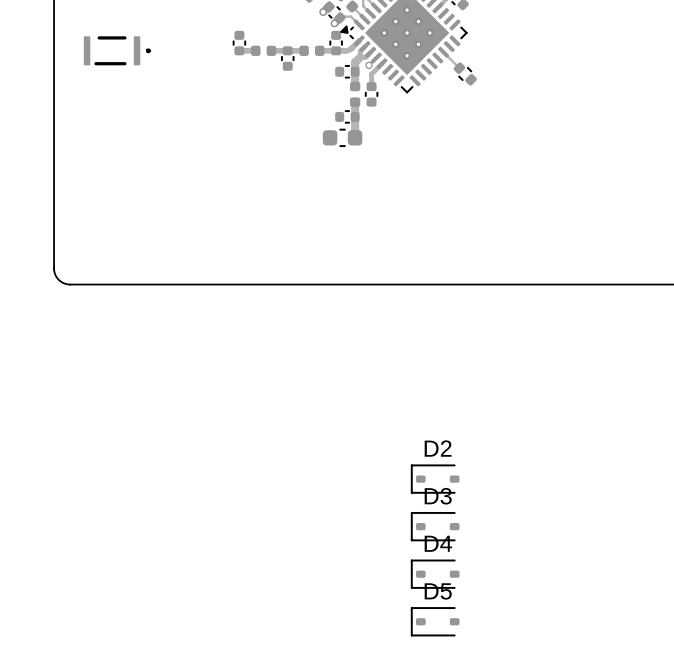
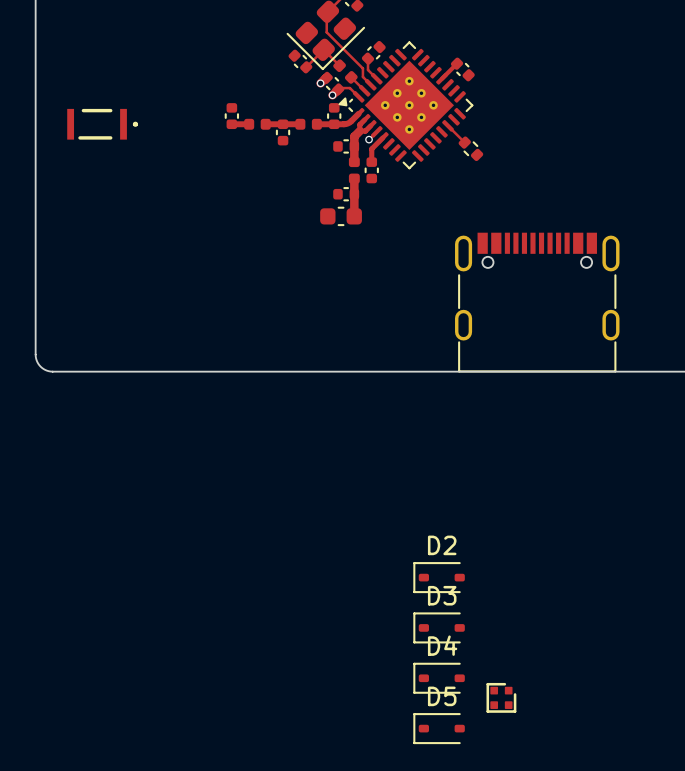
part: none -> (537, 302)
part: none -> (501, 697)

